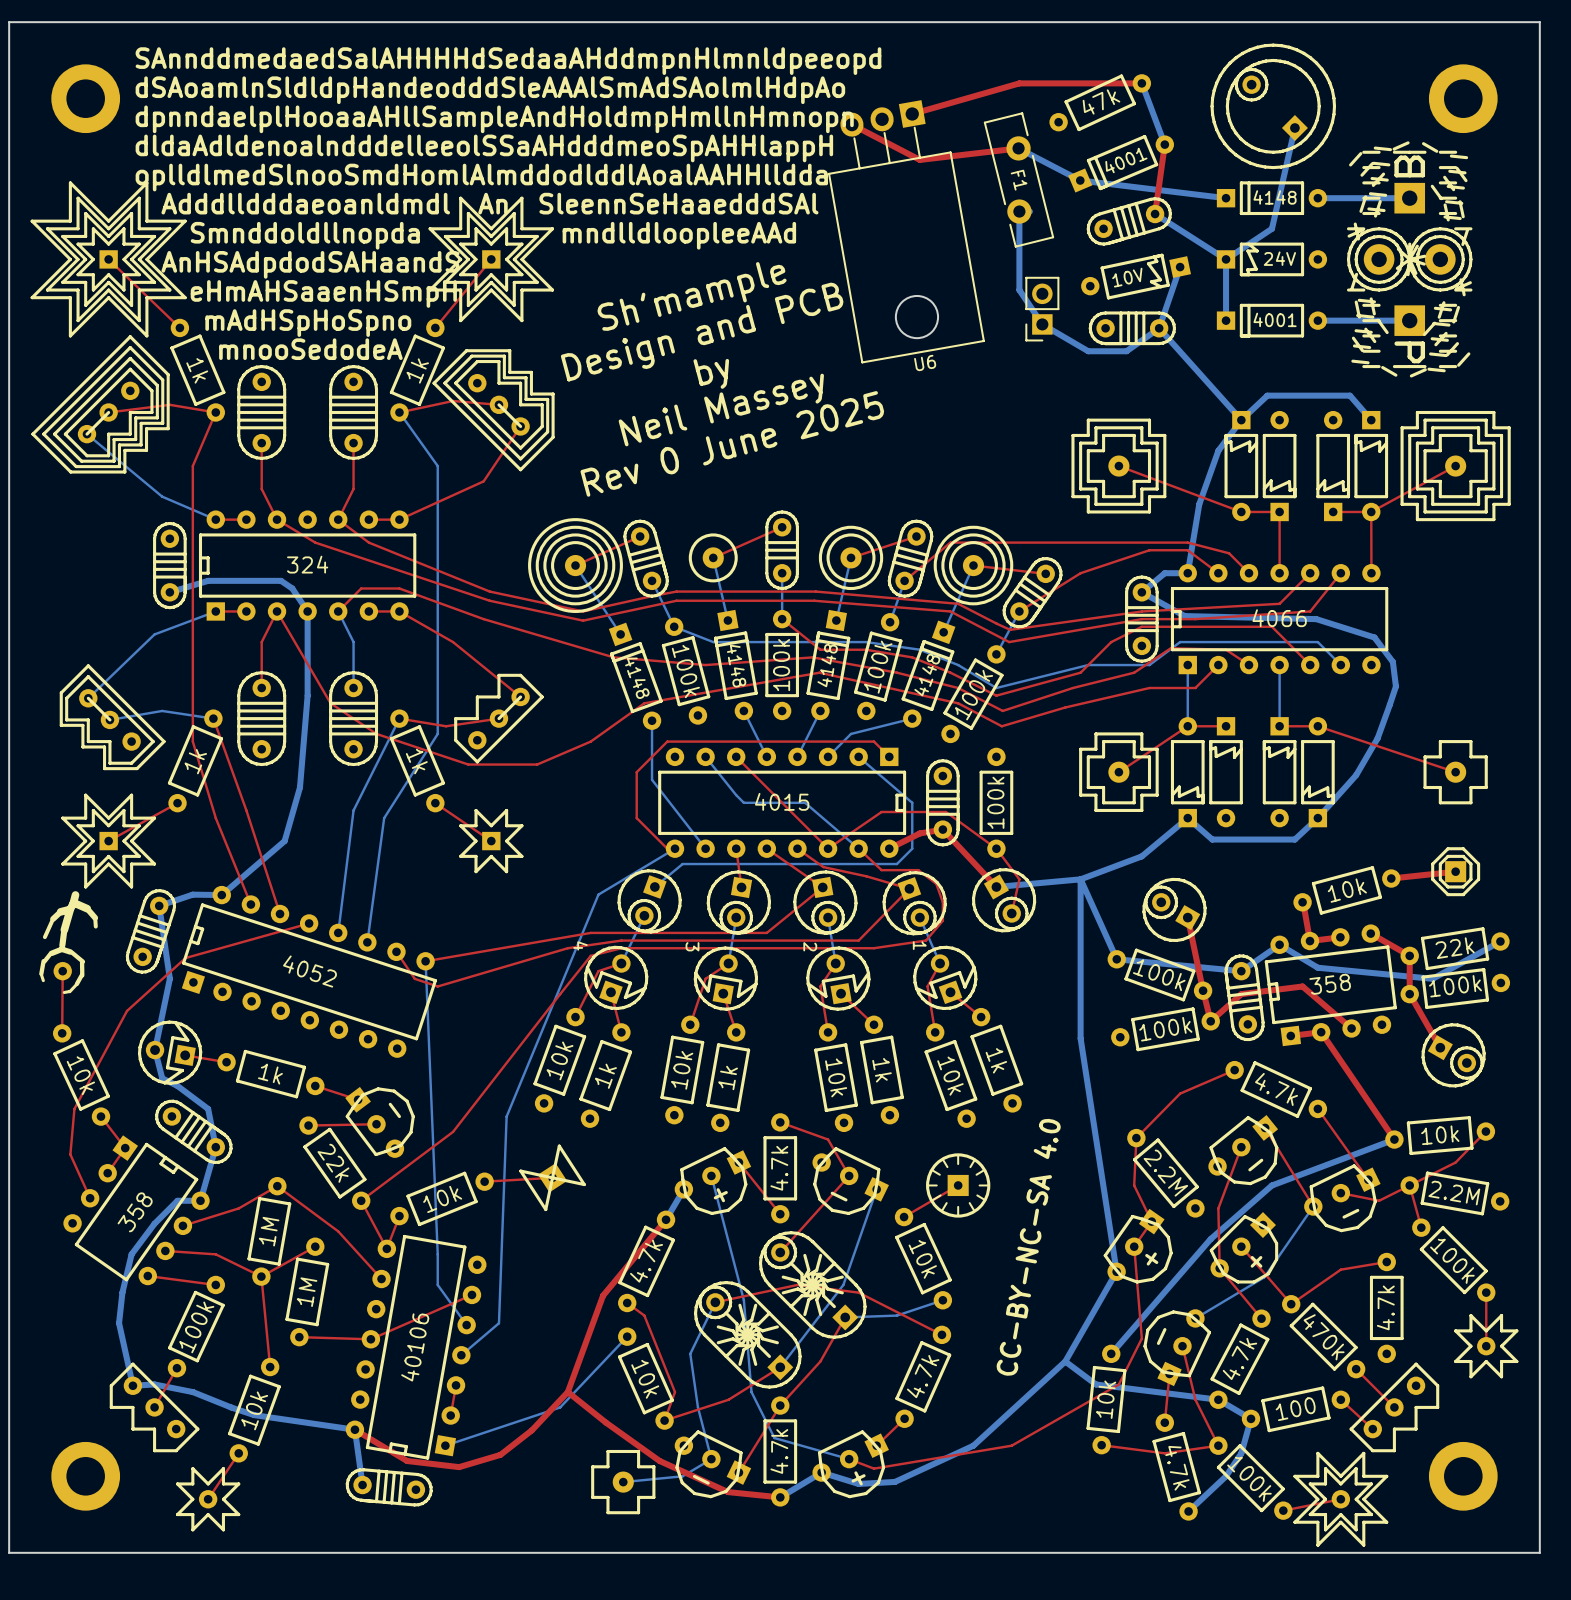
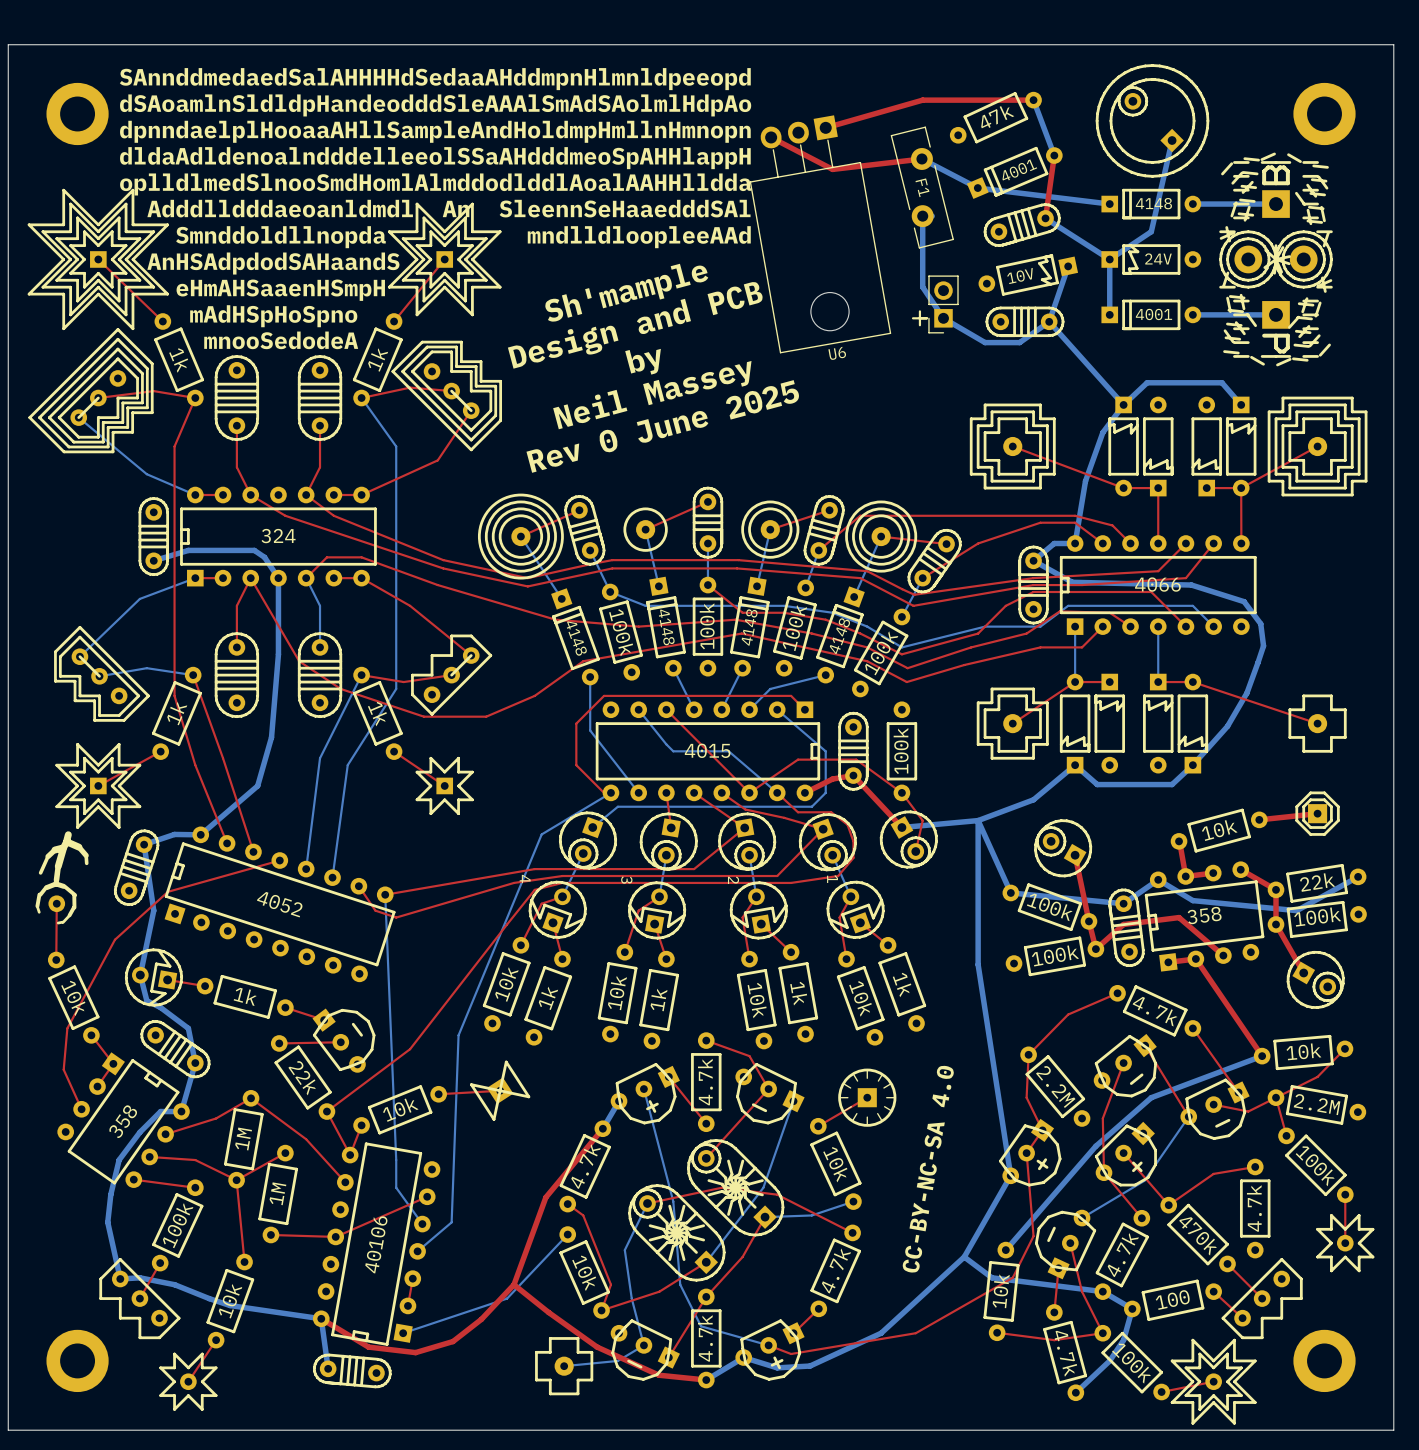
line: none -> (919, 311) (919, 325)
line: none -> (913, 318) (926, 318)

